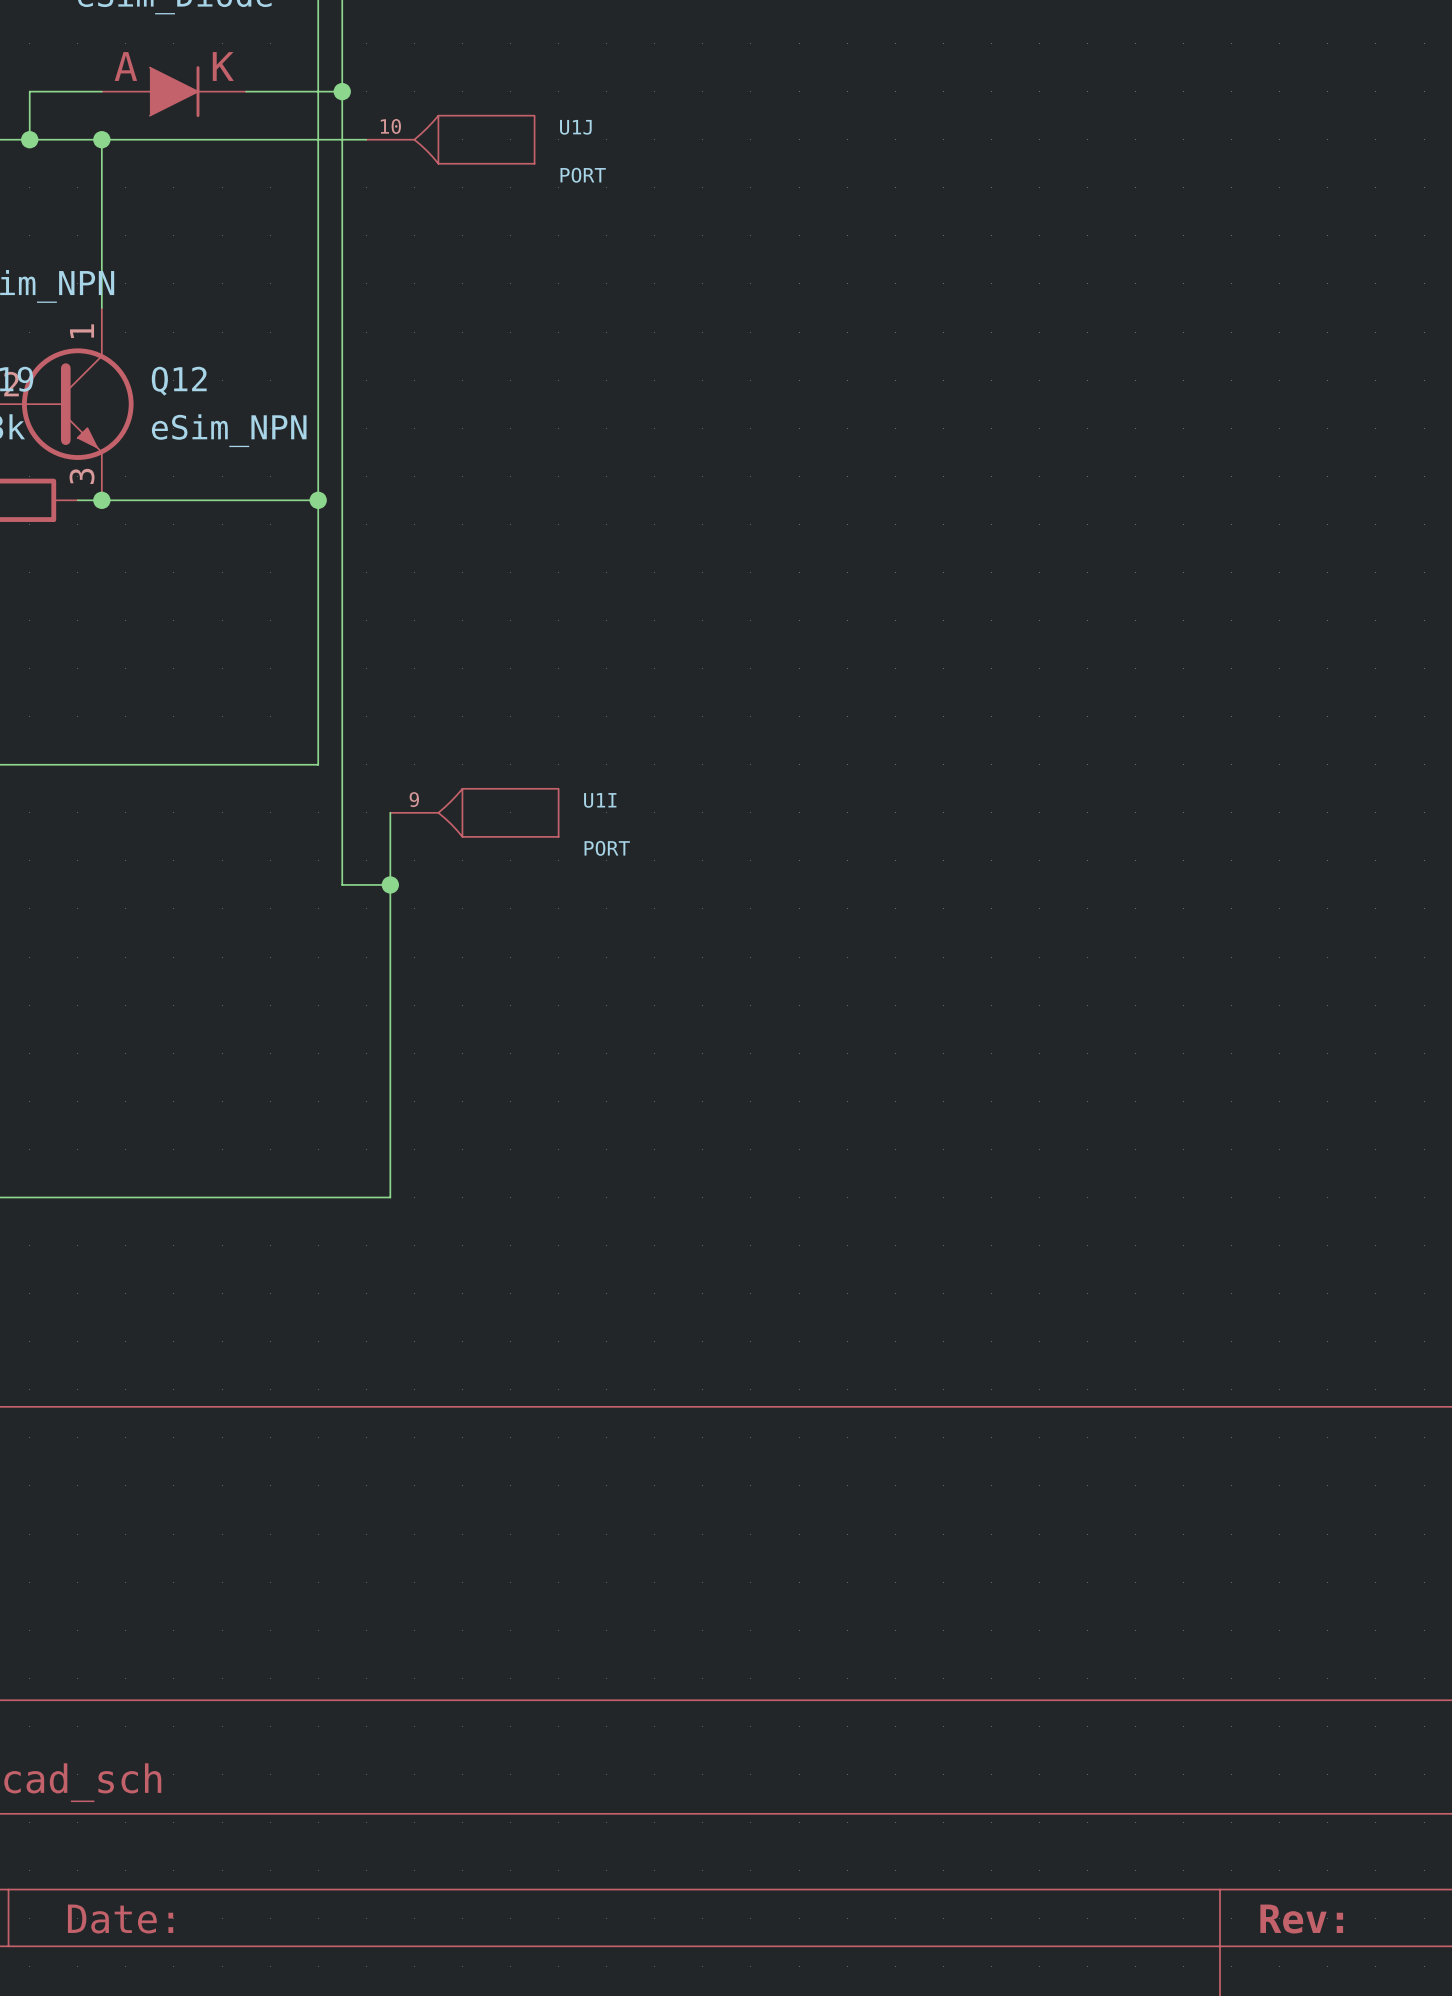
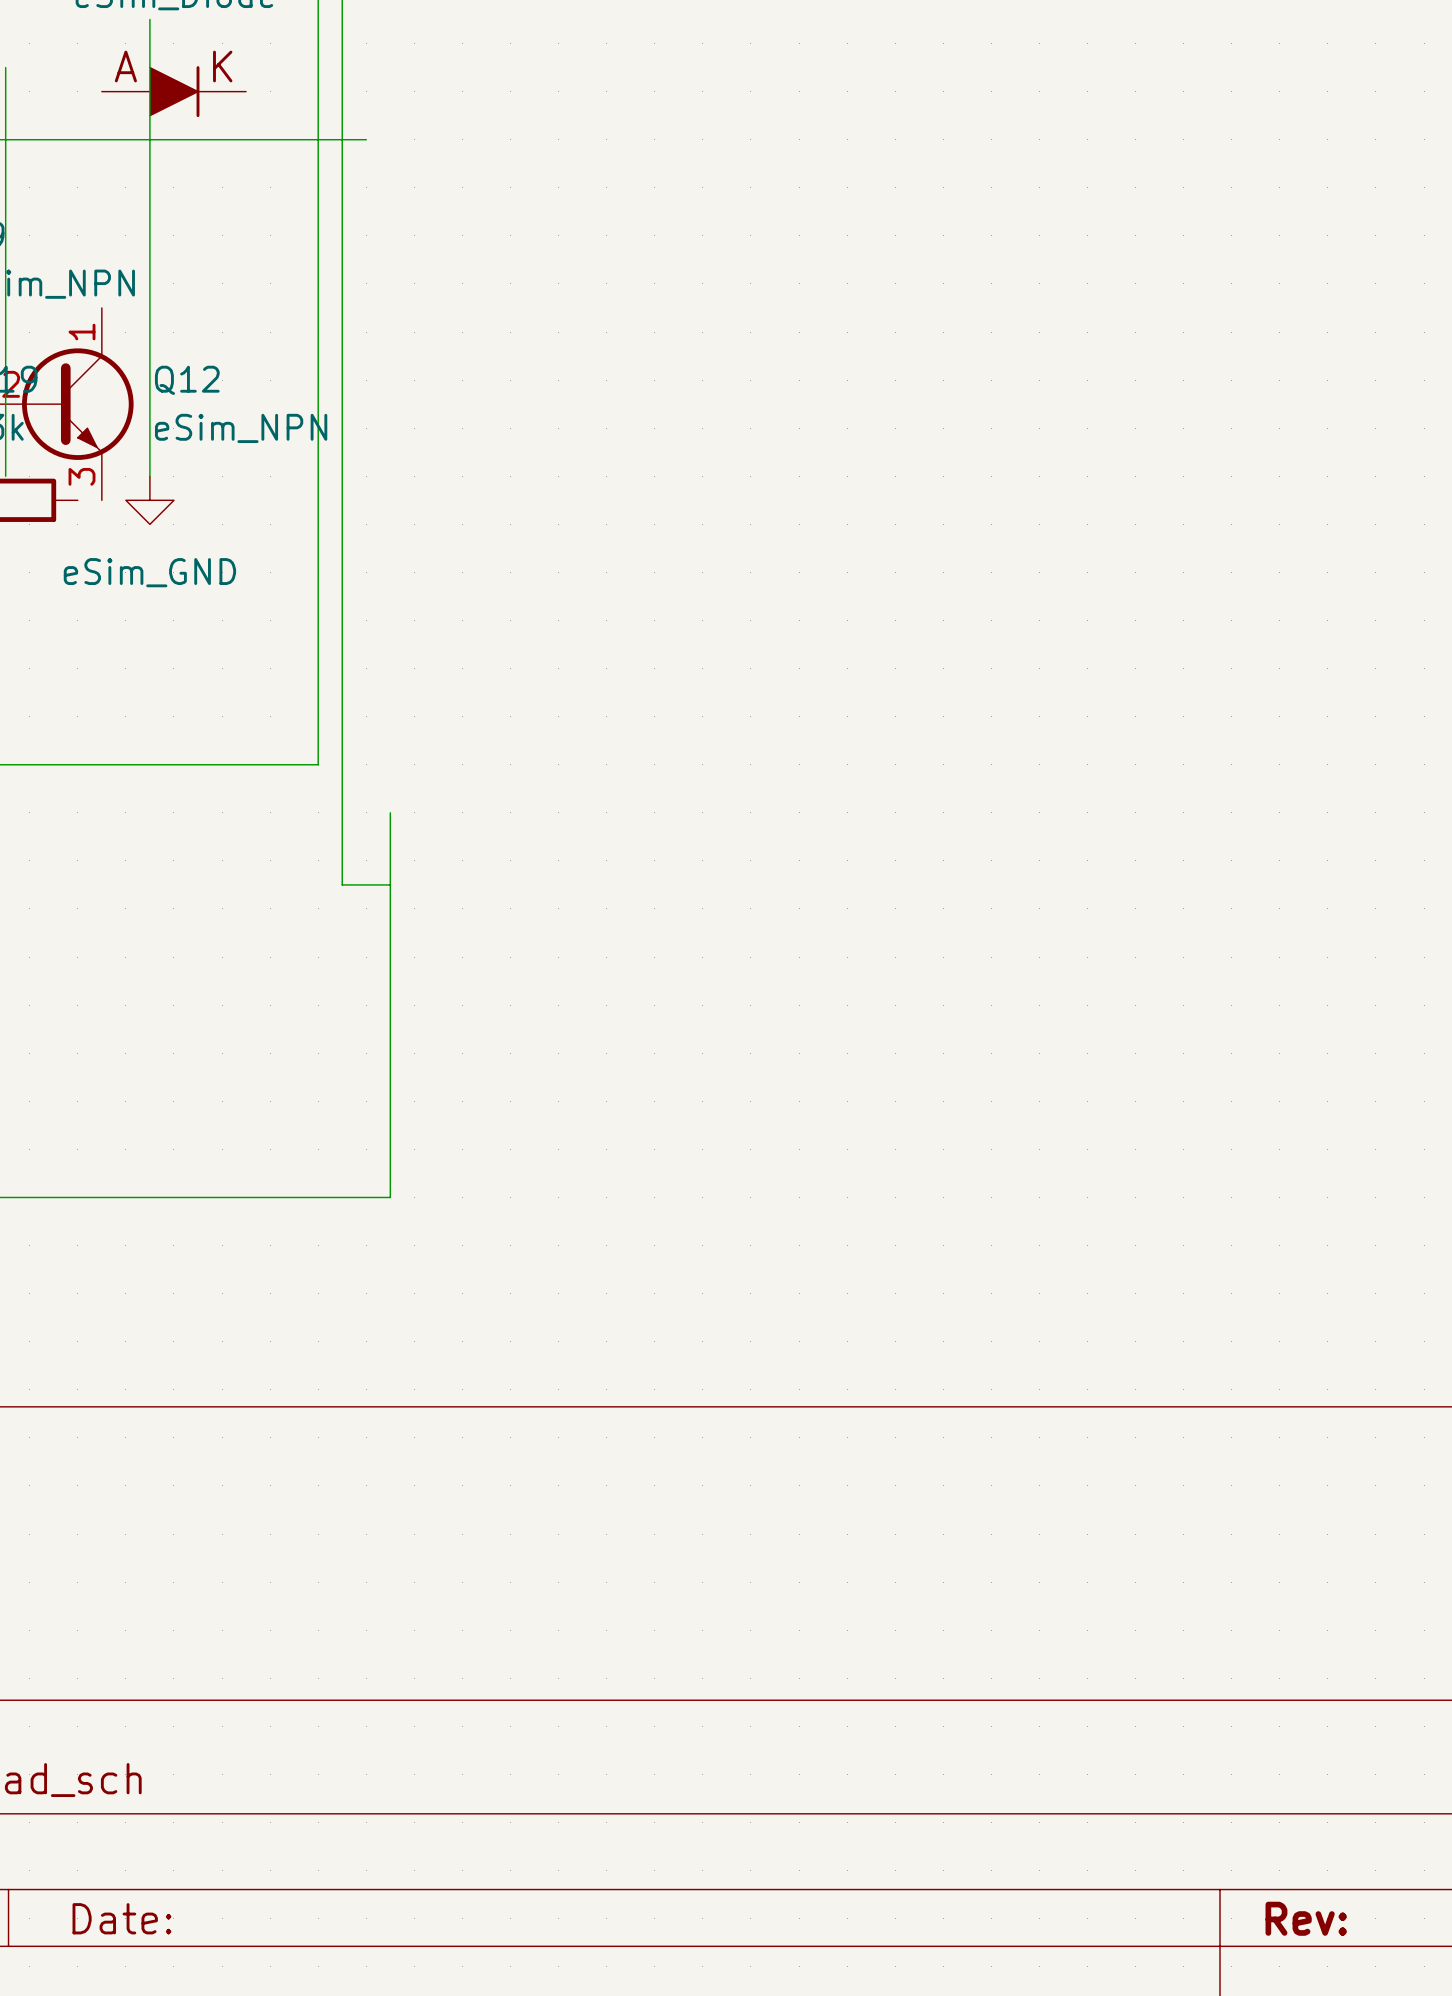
wire: none -> (149, 19) (149, 476)
wire: none -> (5, 67) (5, 476)
wire: (101, 91) (29, 91) (29, 139) -> none
wire: (246, 91) (342, 91) -> none
junction: (342, 91) -> none
junction: (29, 139) -> none
wire: (101, 139) (101, 307) -> none
junction: (101, 139) -> none
U1J: PORT (450, 139) -> none
wire: (77, 500) (318, 500) -> none
junction: (101, 500) -> none
power symbol: none -> eSim_GND (149, 500)
junction: (318, 500) -> none
U1I: PORT (474, 812) -> none
junction: (390, 884) -> none

